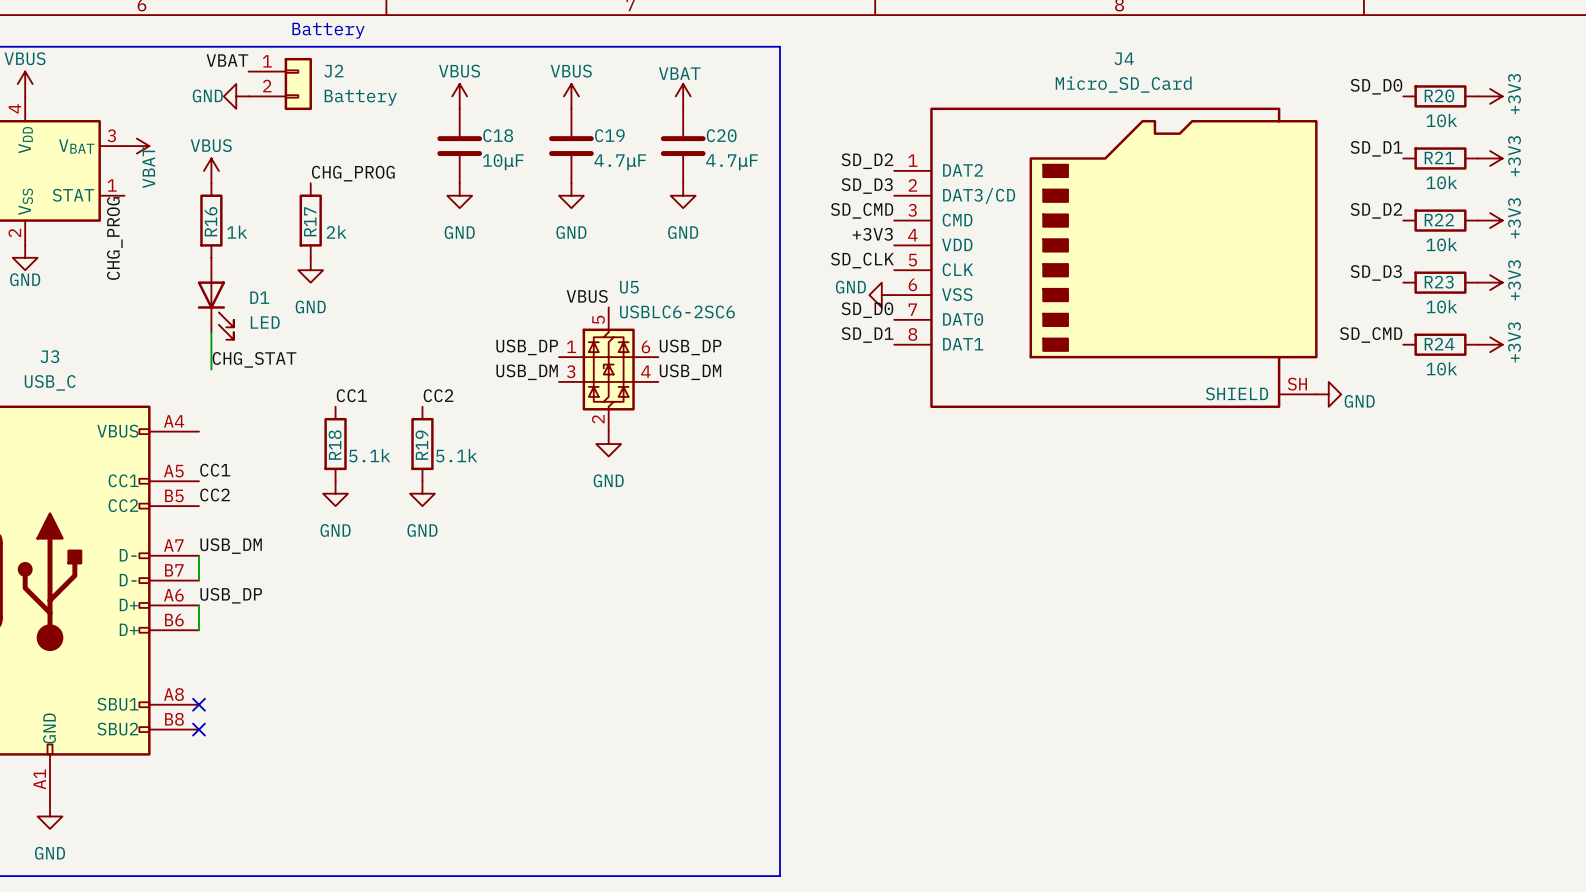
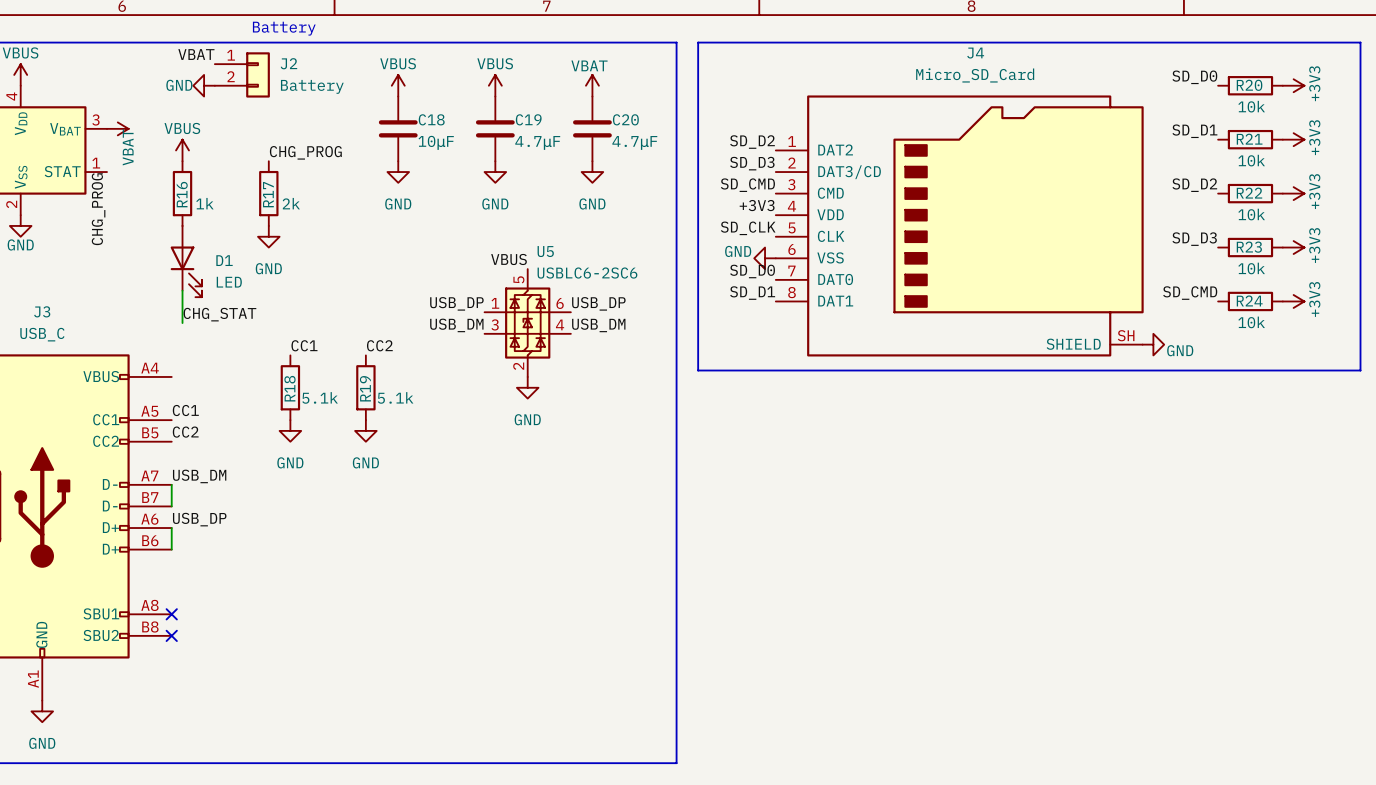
line: none -> (698, 42) (1360, 42) (1360, 370) (698, 370) (698, 42)

